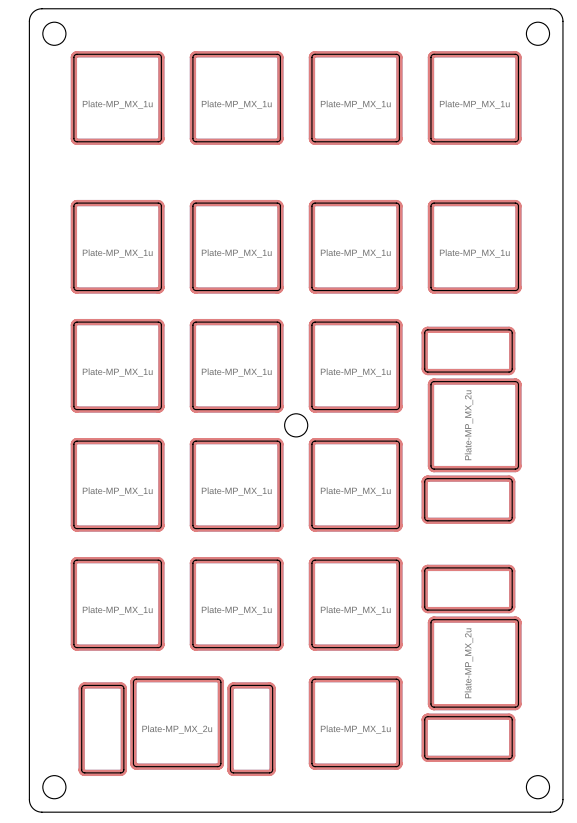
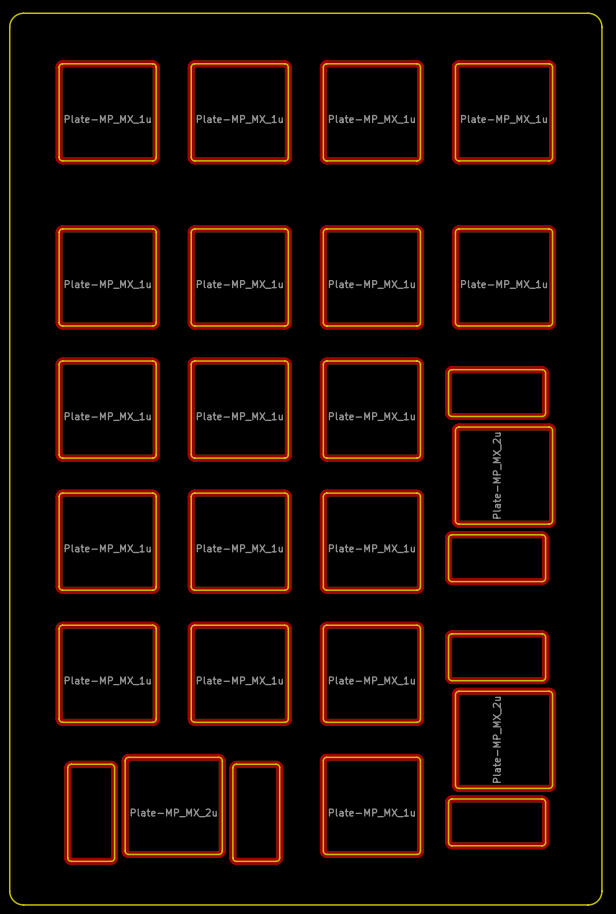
round board edge: [42, 21, 67, 46] -> none
round board edge: [525, 21, 551, 46] -> none
round board edge: [284, 413, 309, 438] -> none
round board edge: [42, 775, 67, 800] -> none
round board edge: [525, 775, 551, 800] -> none

